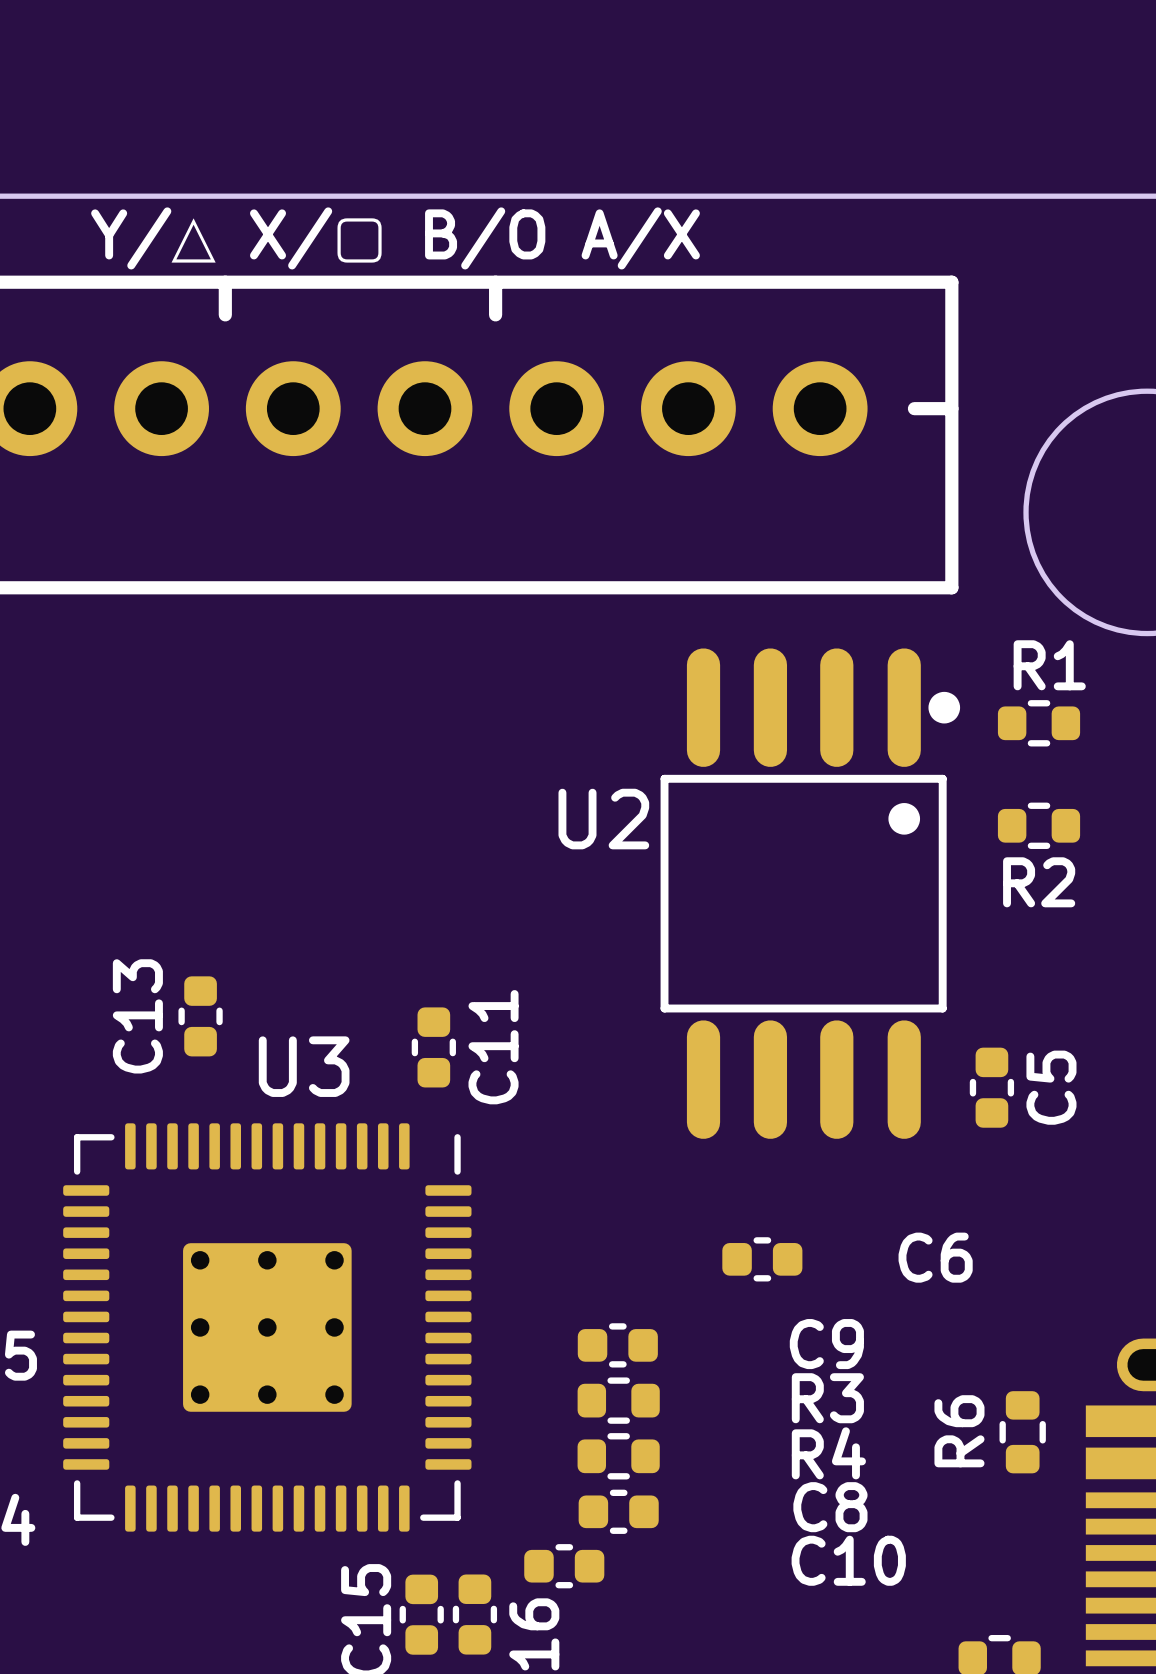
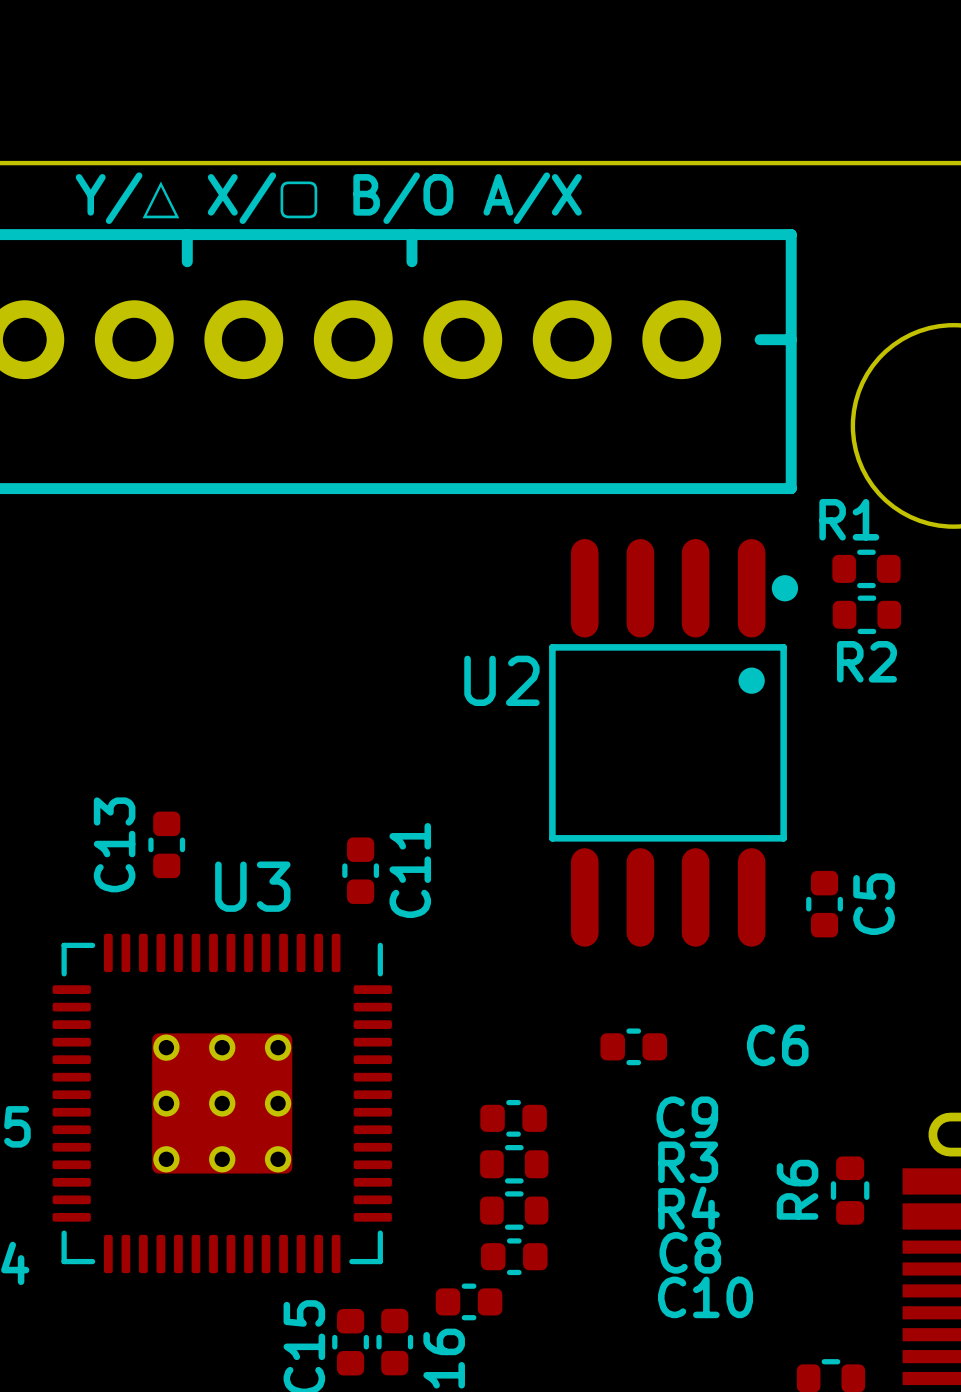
R1 name position: R1 (1049, 665) -> R1 (849, 519)
R1 position: (1039, 723) -> (866, 568)
R2 position: (1039, 825) -> (866, 614)

